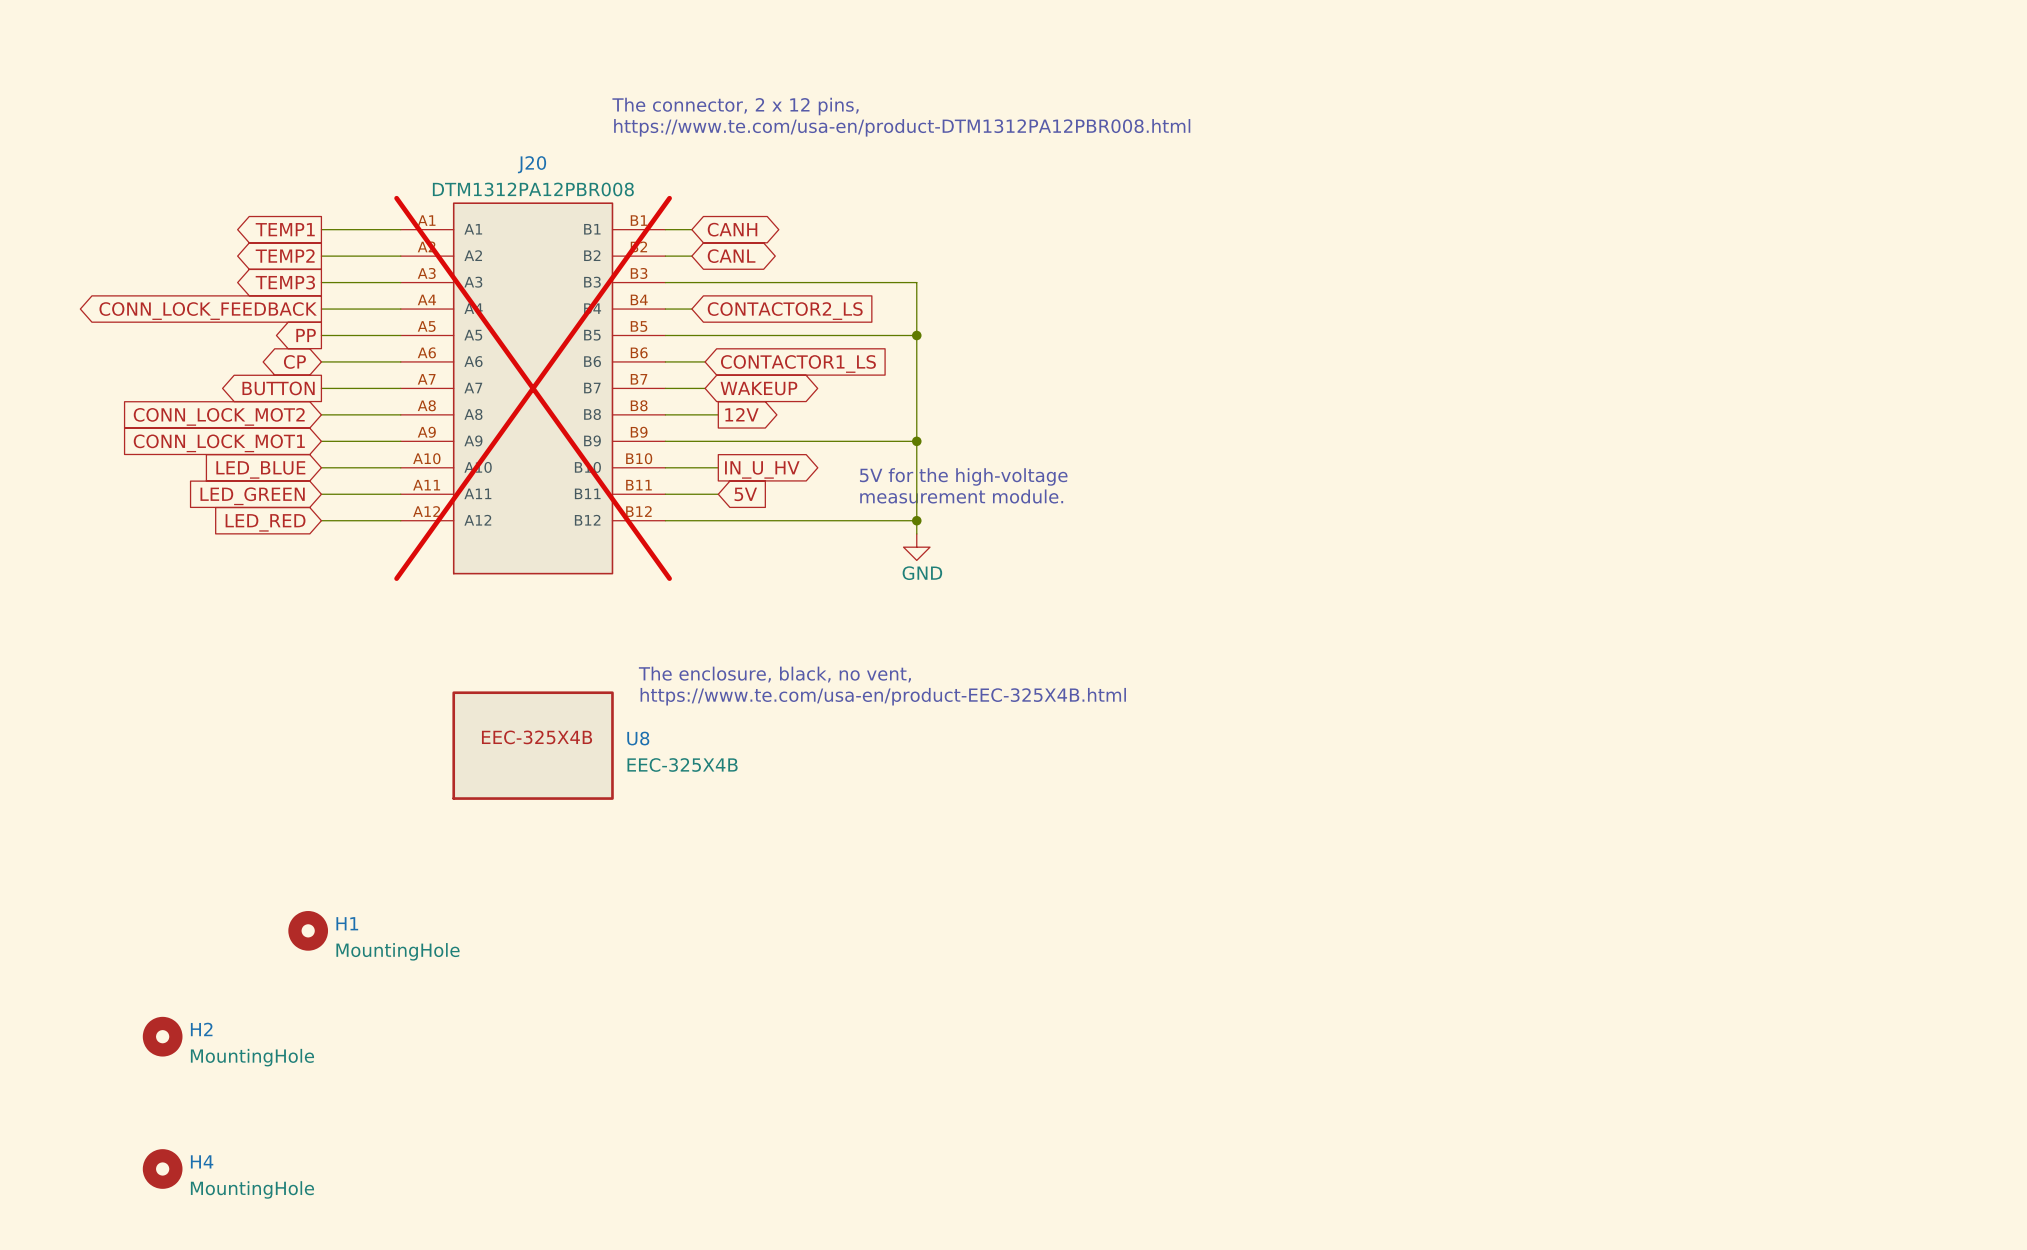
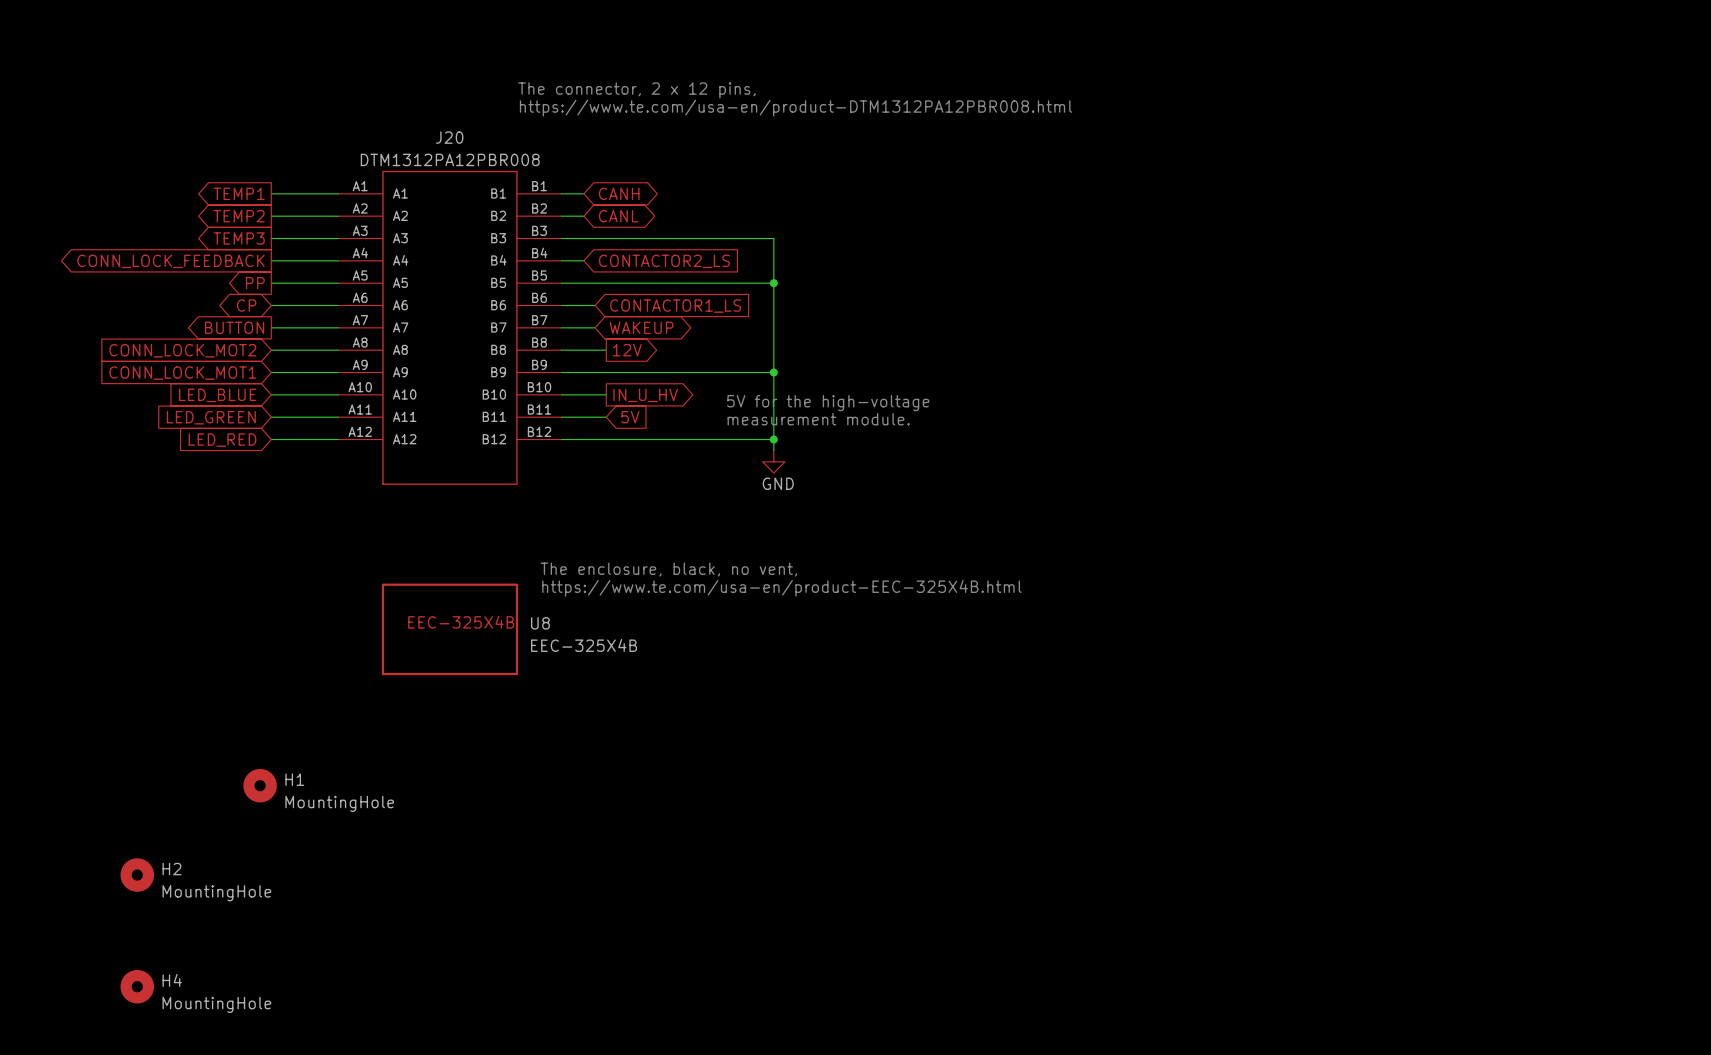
J20 do-not-place cross: (533, 388) -> none

